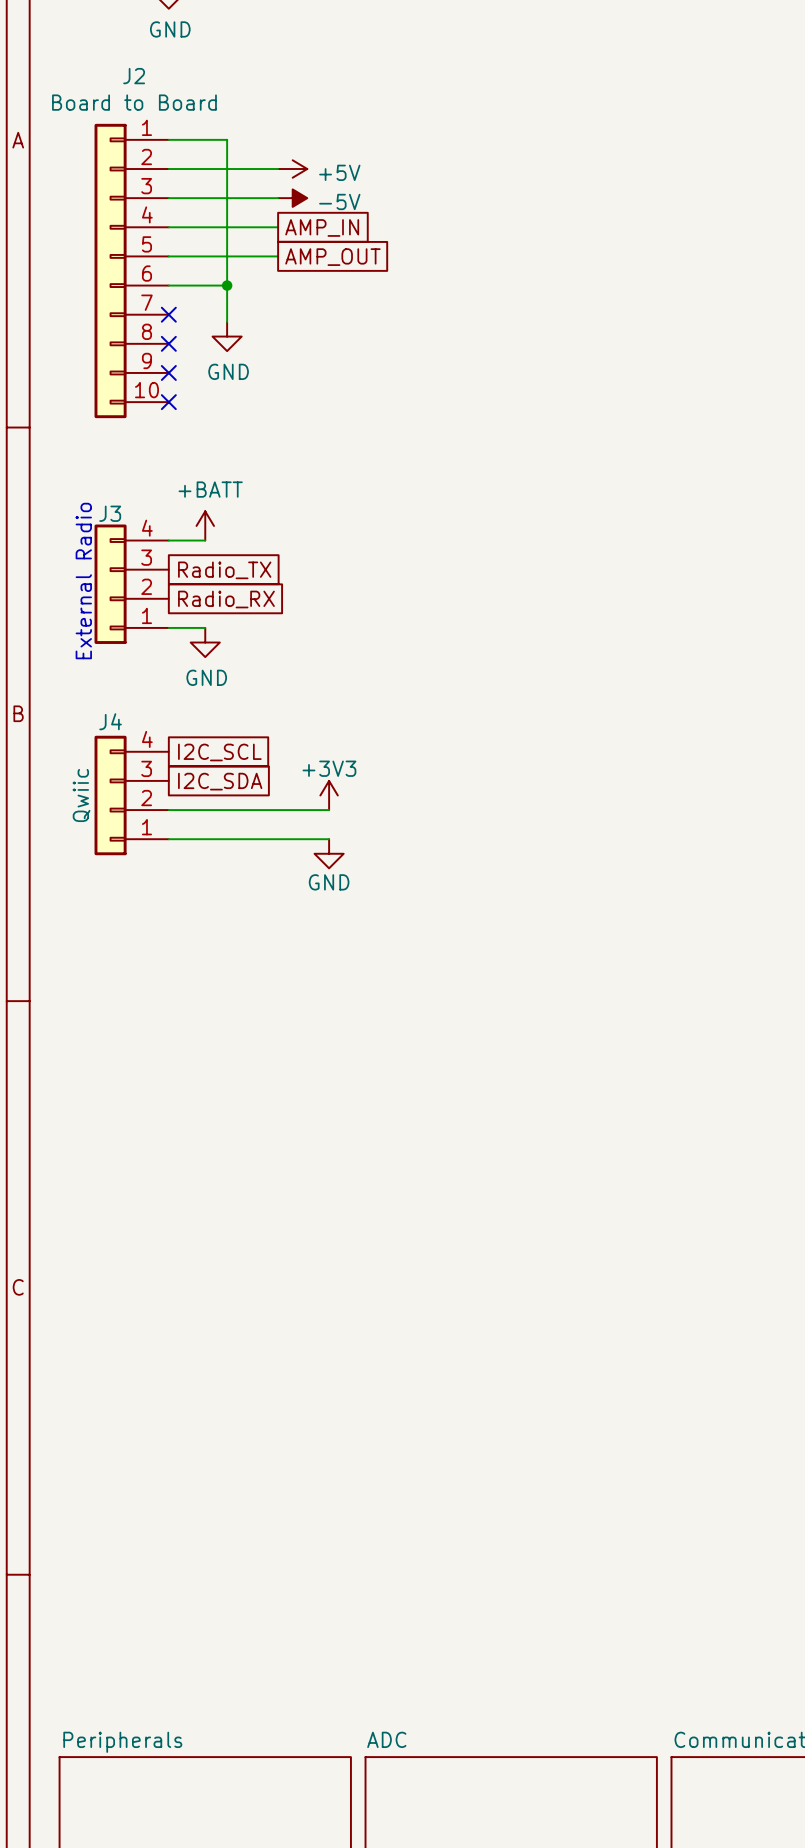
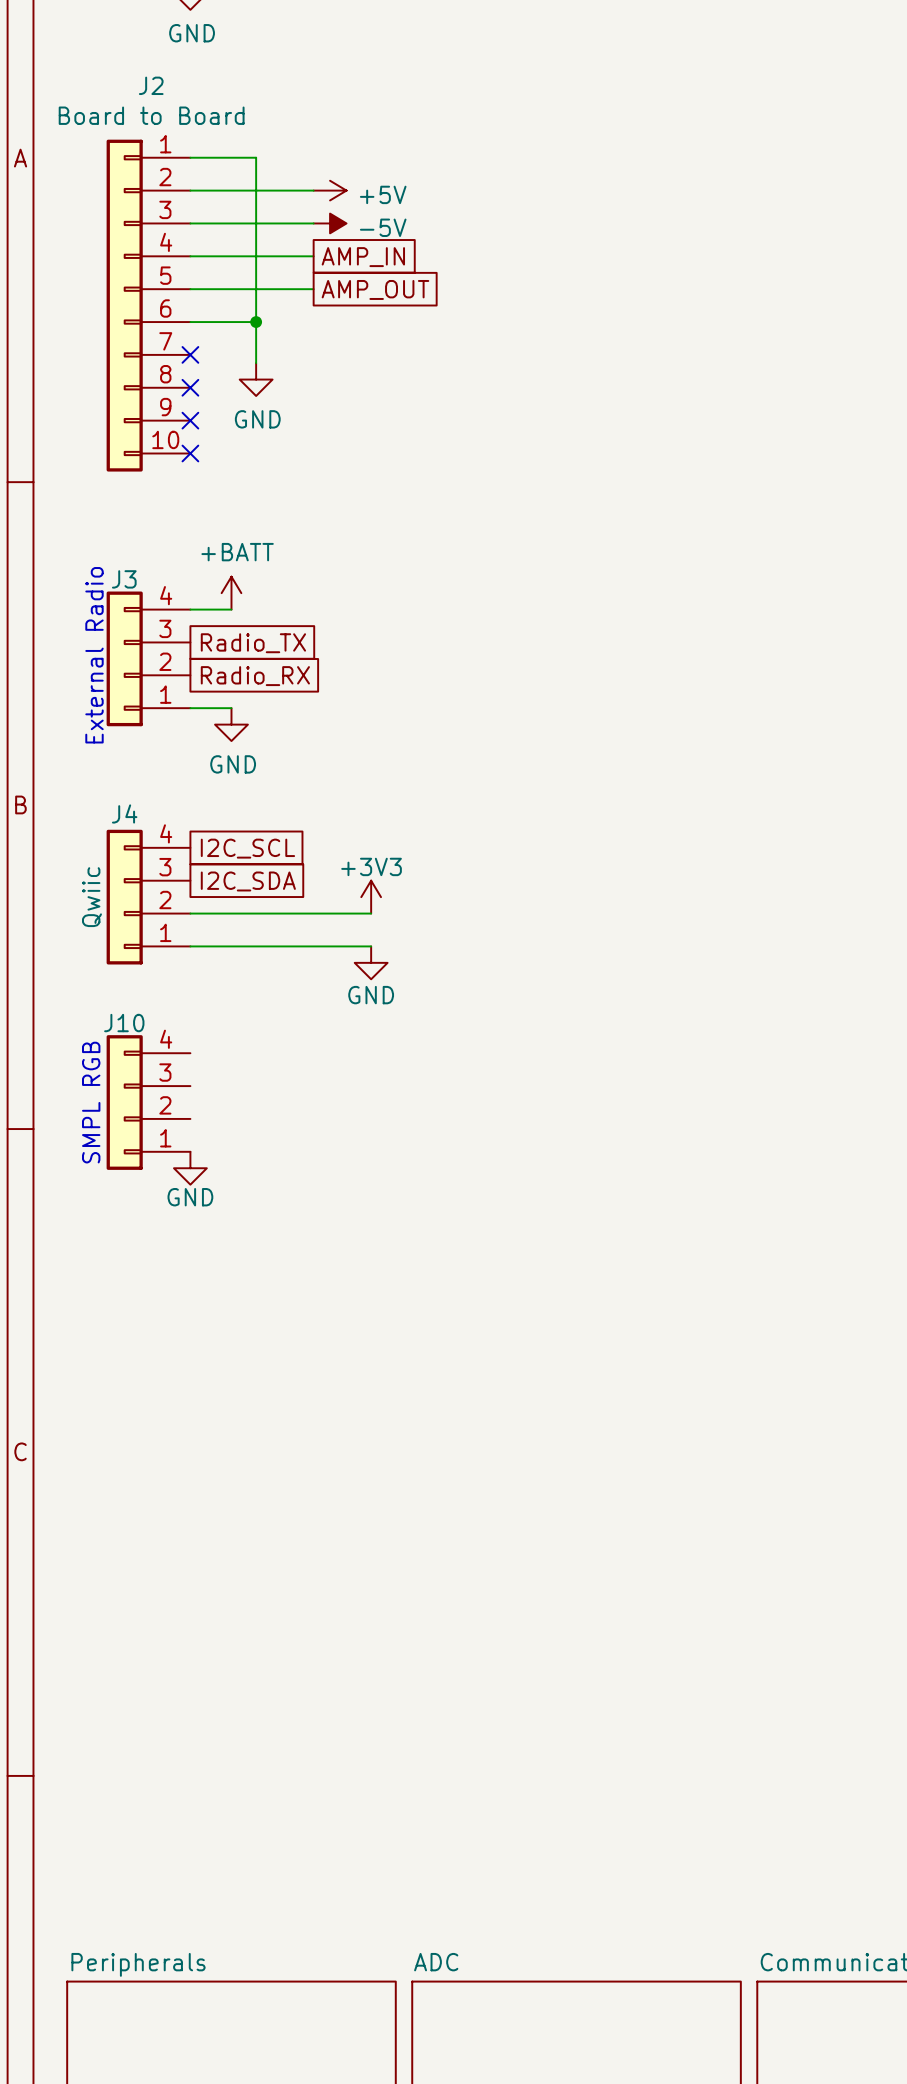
text: none -> SMPL RGB (91, 1102)
J10: none -> (148, 1102)
power symbol: none -> GND (190, 1168)

